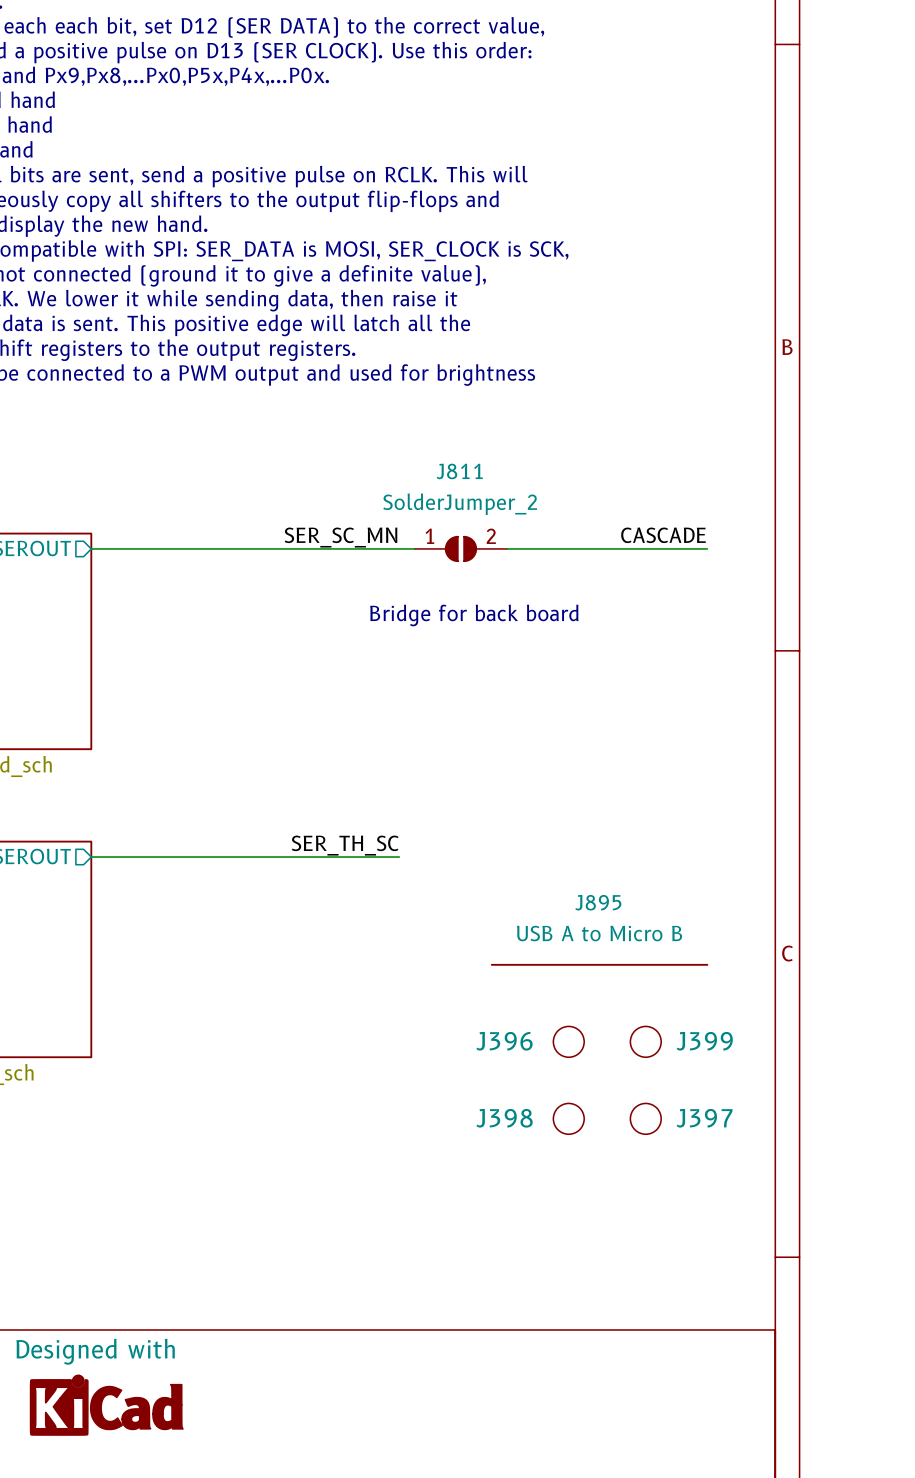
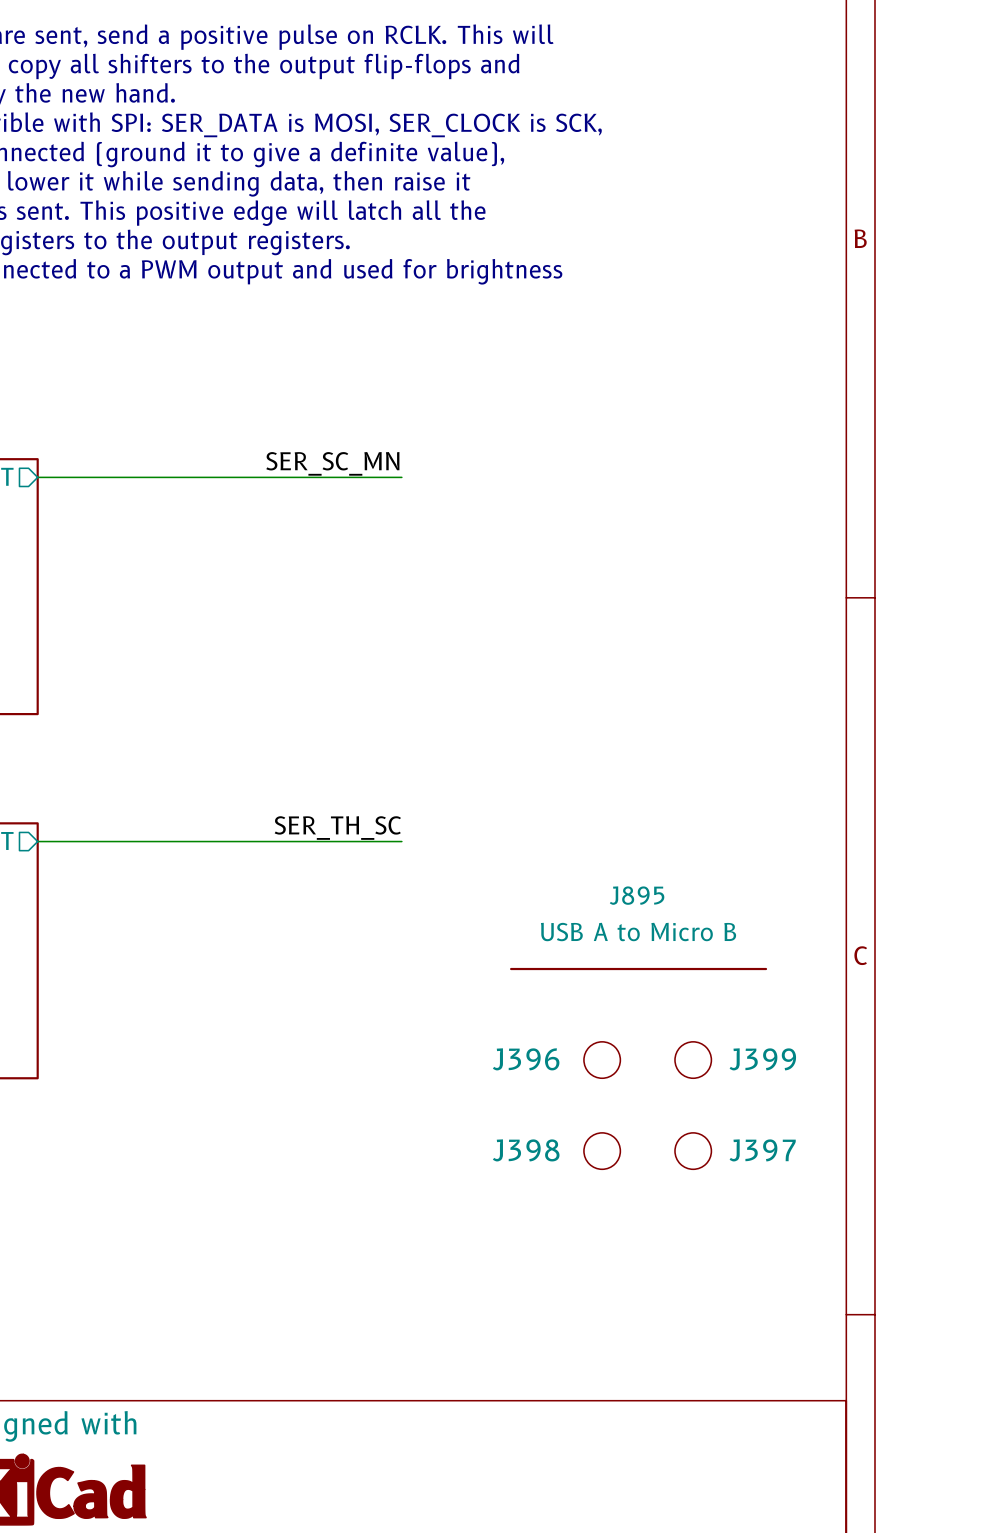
label: CASCADE (663, 535) -> none
wire: (399, 548) (414, 548) -> none
J811: SolderJumper_2 (460, 548) -> none
wire: (507, 548) (707, 548) -> none
text: Bridge for back board (474, 615) -> none

